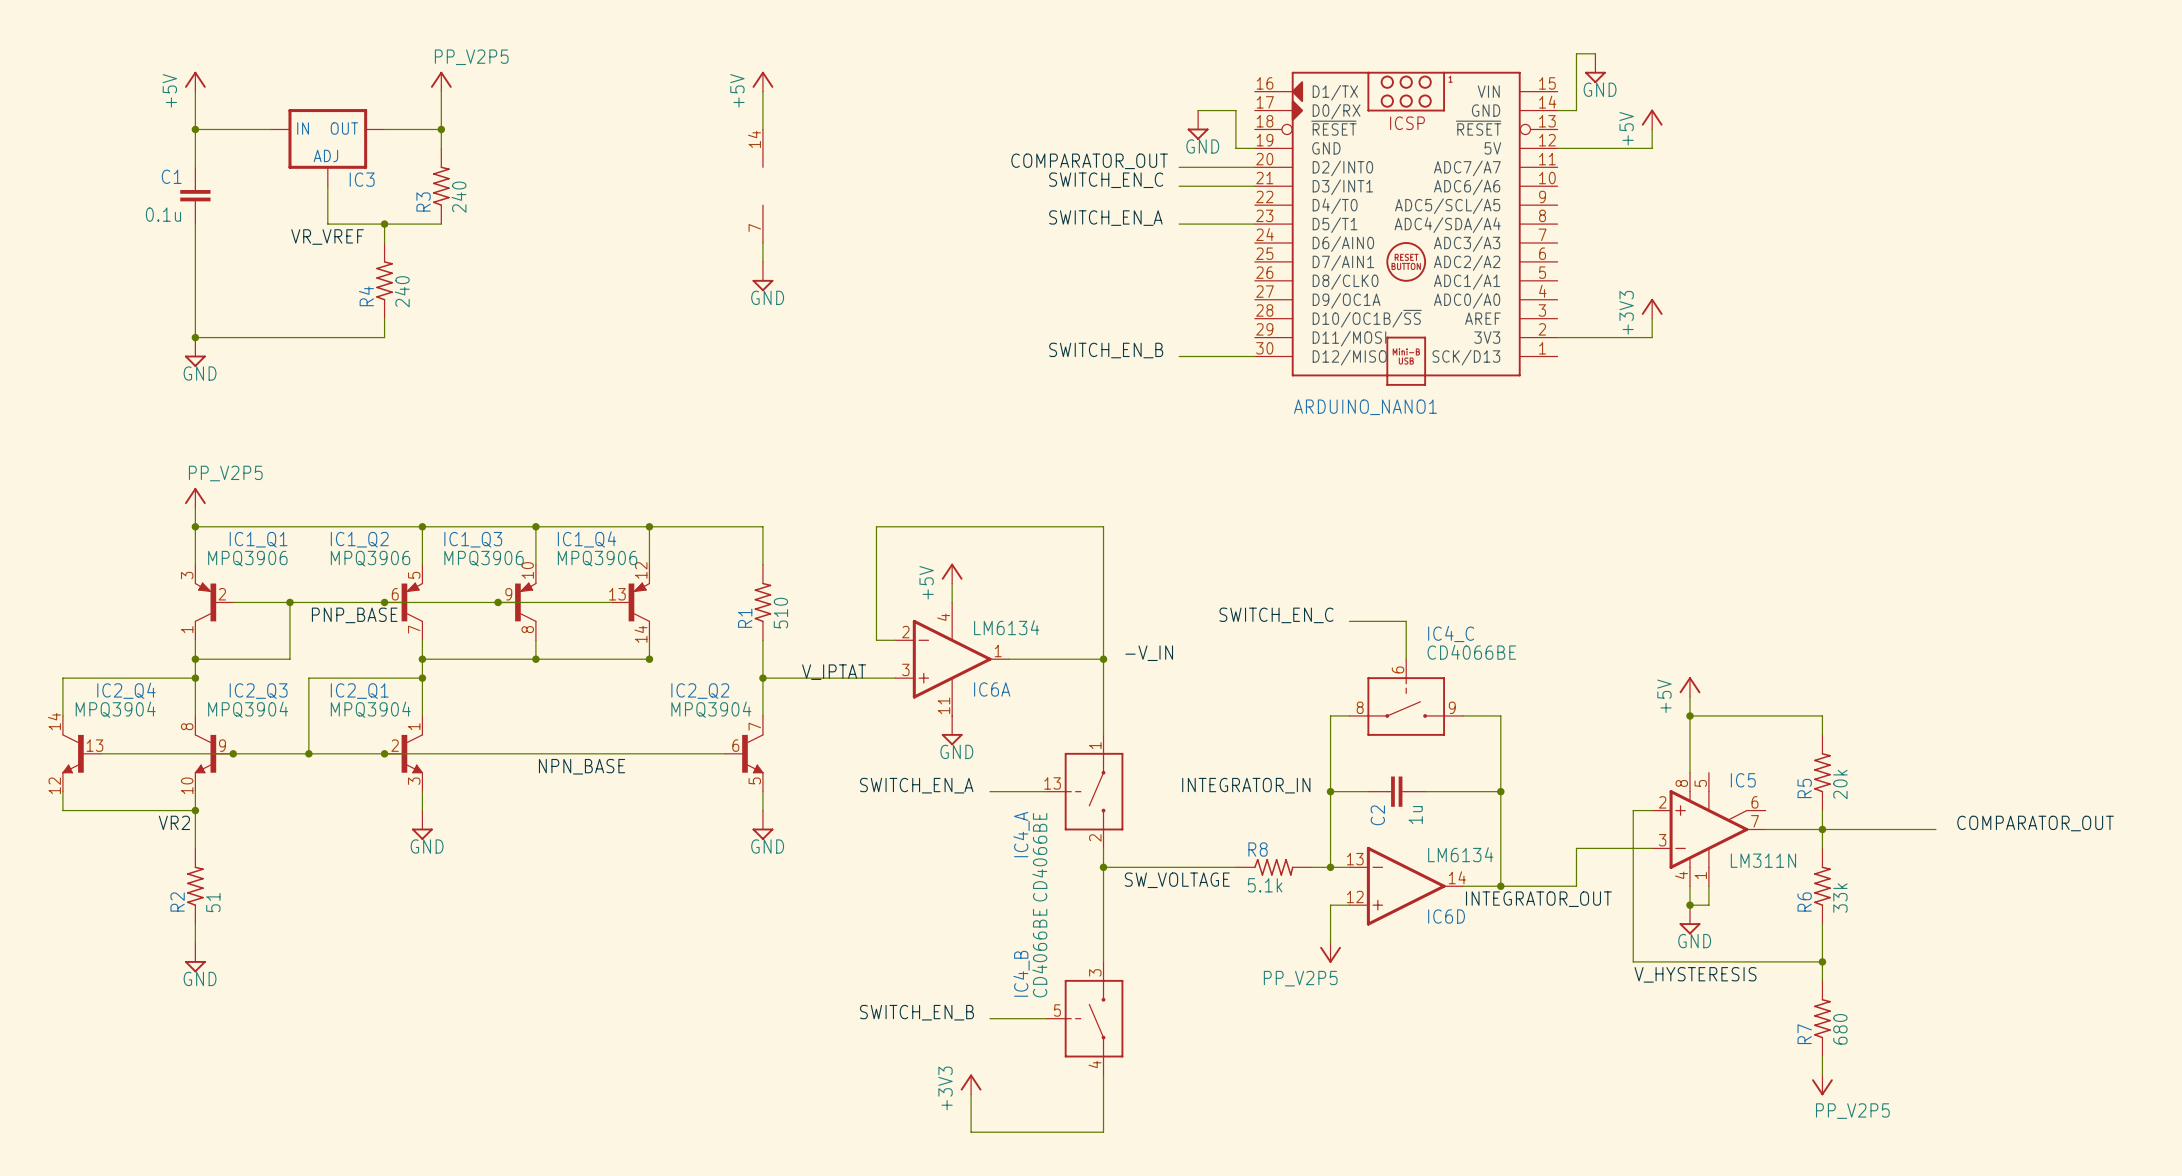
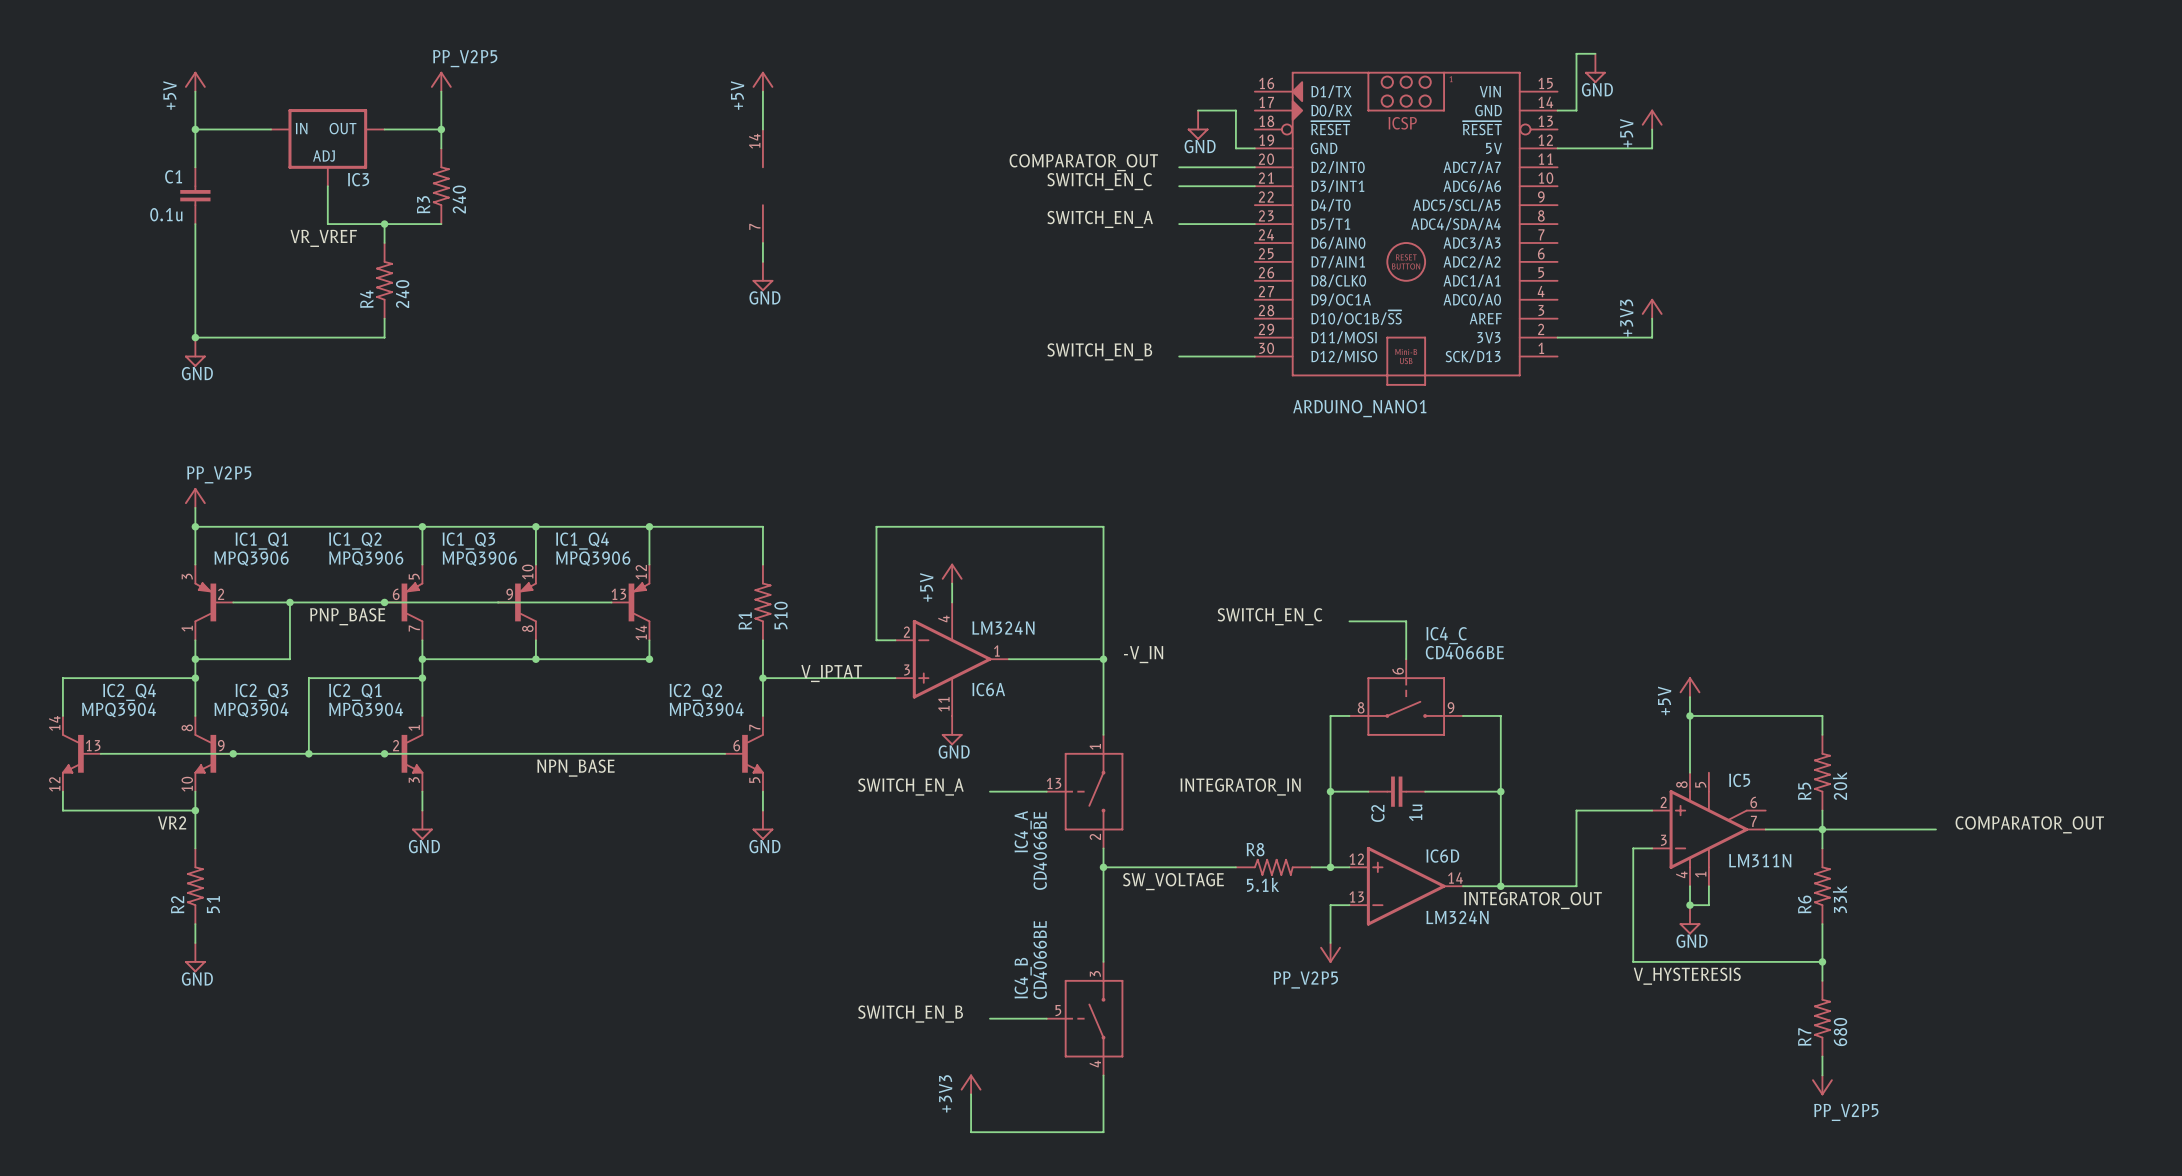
junction: (498, 602) -> none
IC6A value: LM6134 (1006, 627) -> LM324N (1003, 628)
wire: (1633, 810) (1633, 848) (1576, 848) -> (1633, 810) (1576, 810) (1576, 848)
IC6D value: LM6134 (1460, 854) -> LM324N (1457, 917)
IC6D flip: as is (1406, 886) -> up-down (1406, 886)

